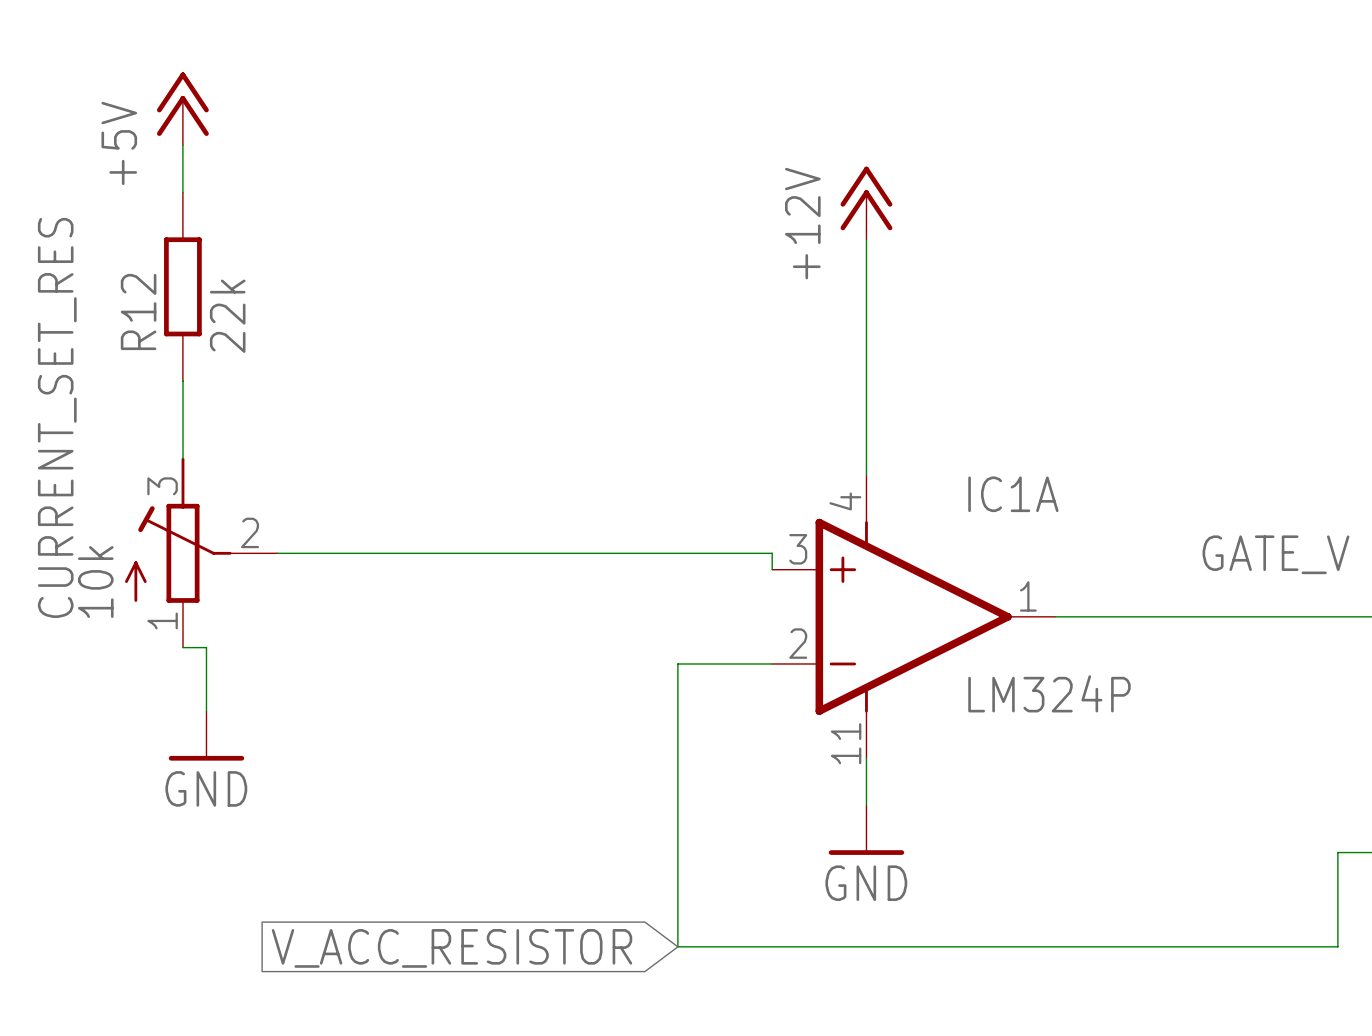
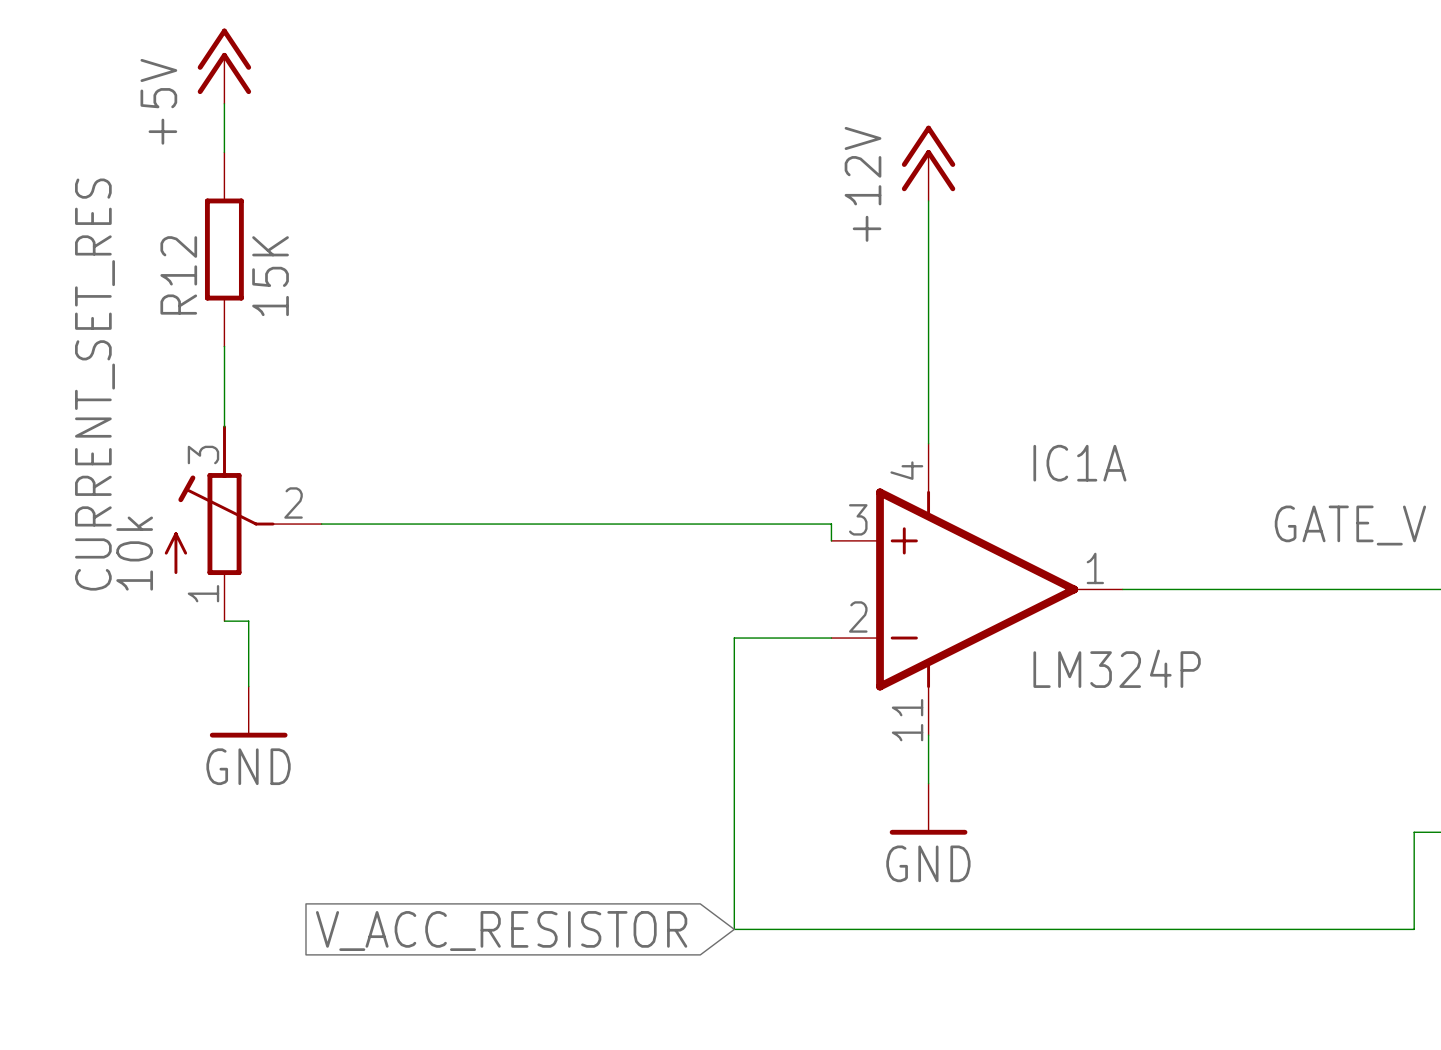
R12 value: 22k (227, 316) -> 15K (270, 276)

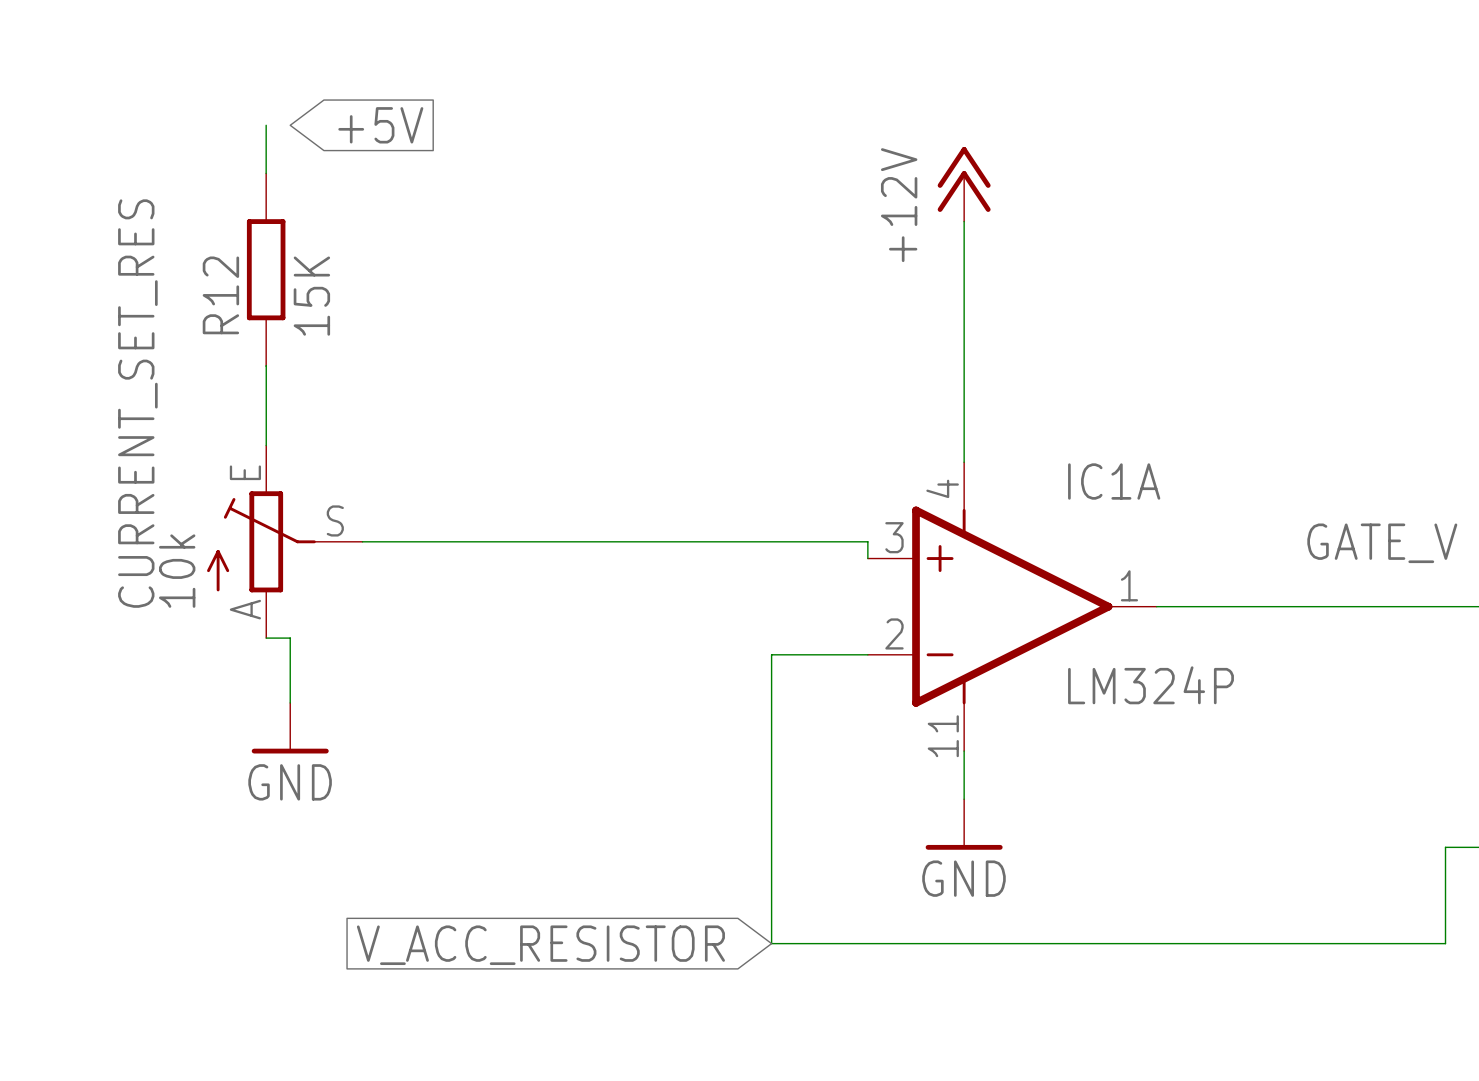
power symbol: +5V (224, 66) -> none
global label: none -> +5V (380, 125)
CURRENT_SET_RES symbol: [164, 425, 322, 622] -> [207, 445, 363, 639]

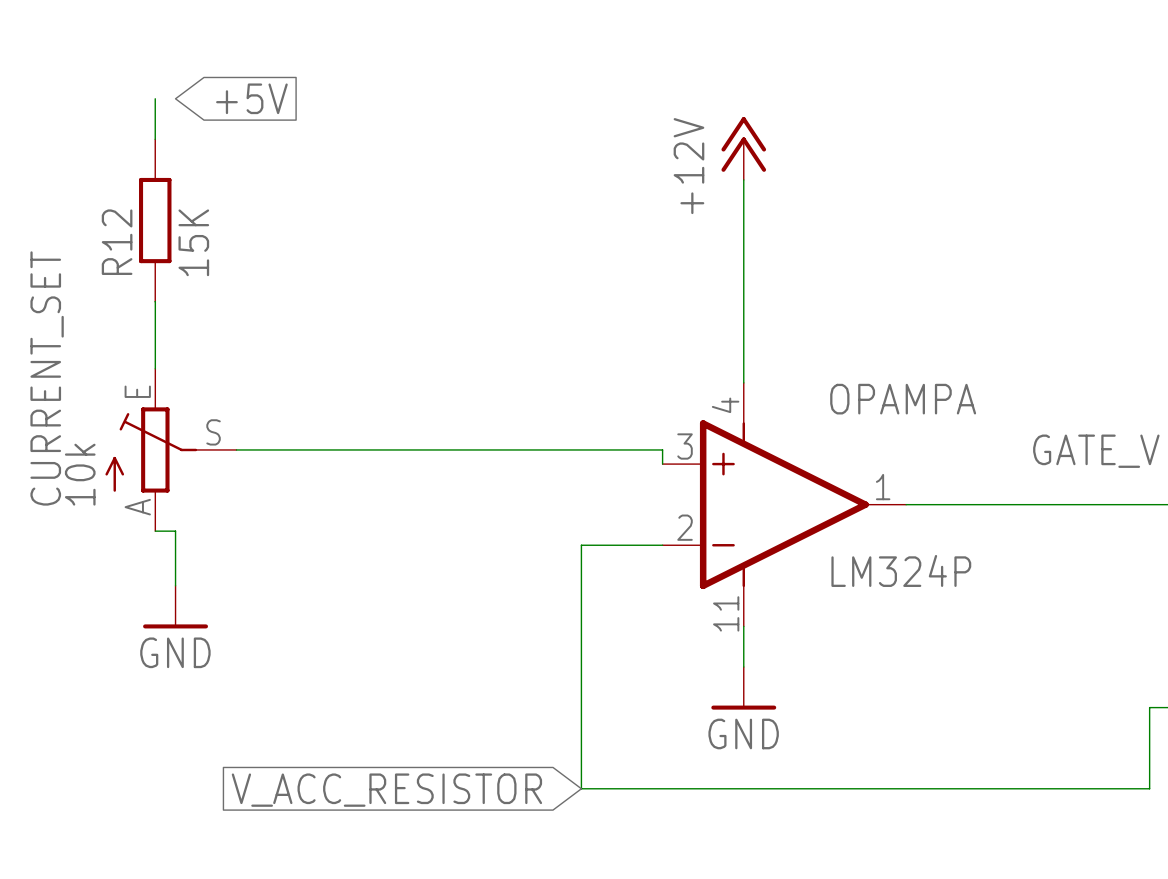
CURRENT_SET_RES name: CURRENT_SET_RES (137, 403) -> CURRENT_SET (47, 378)
IC1A name: IC1A (1114, 481) -> OPAMPA (903, 399)

